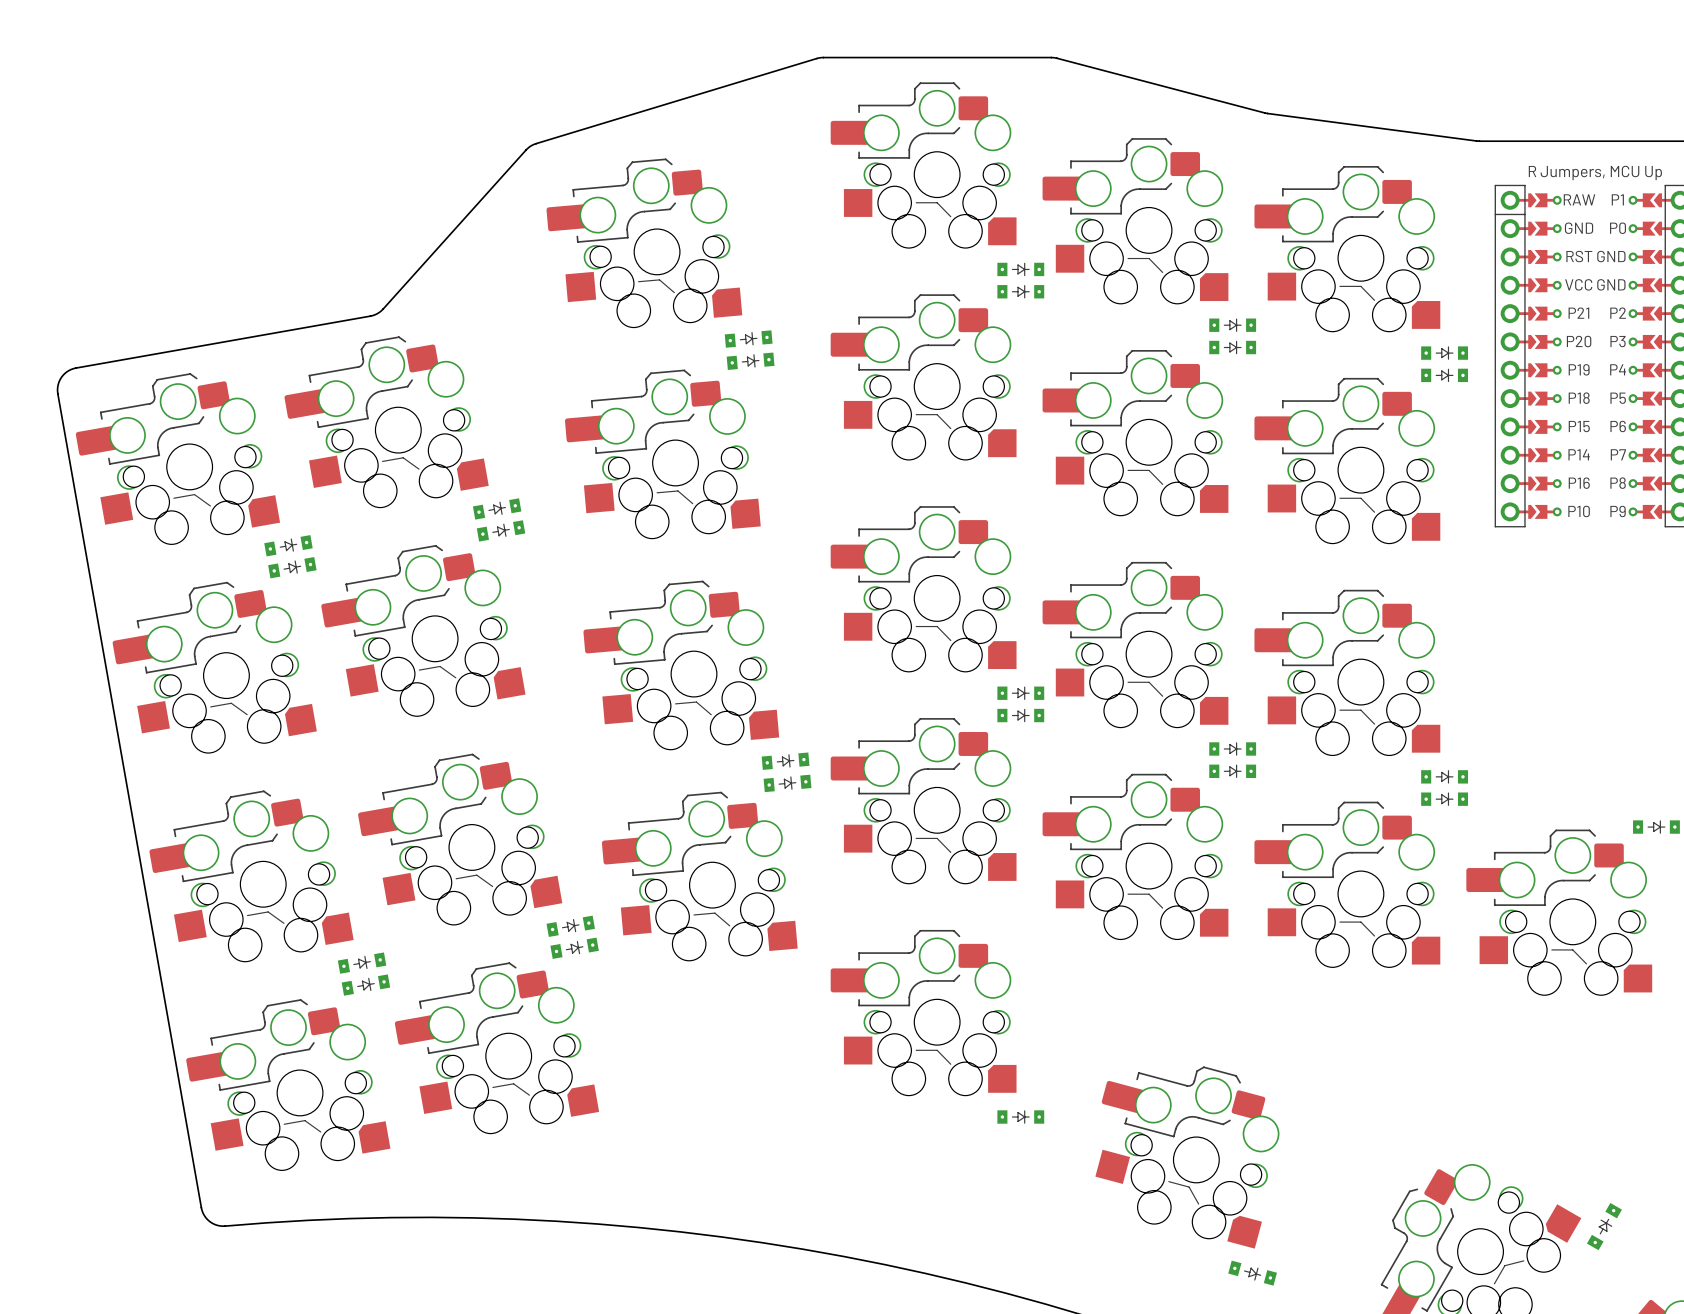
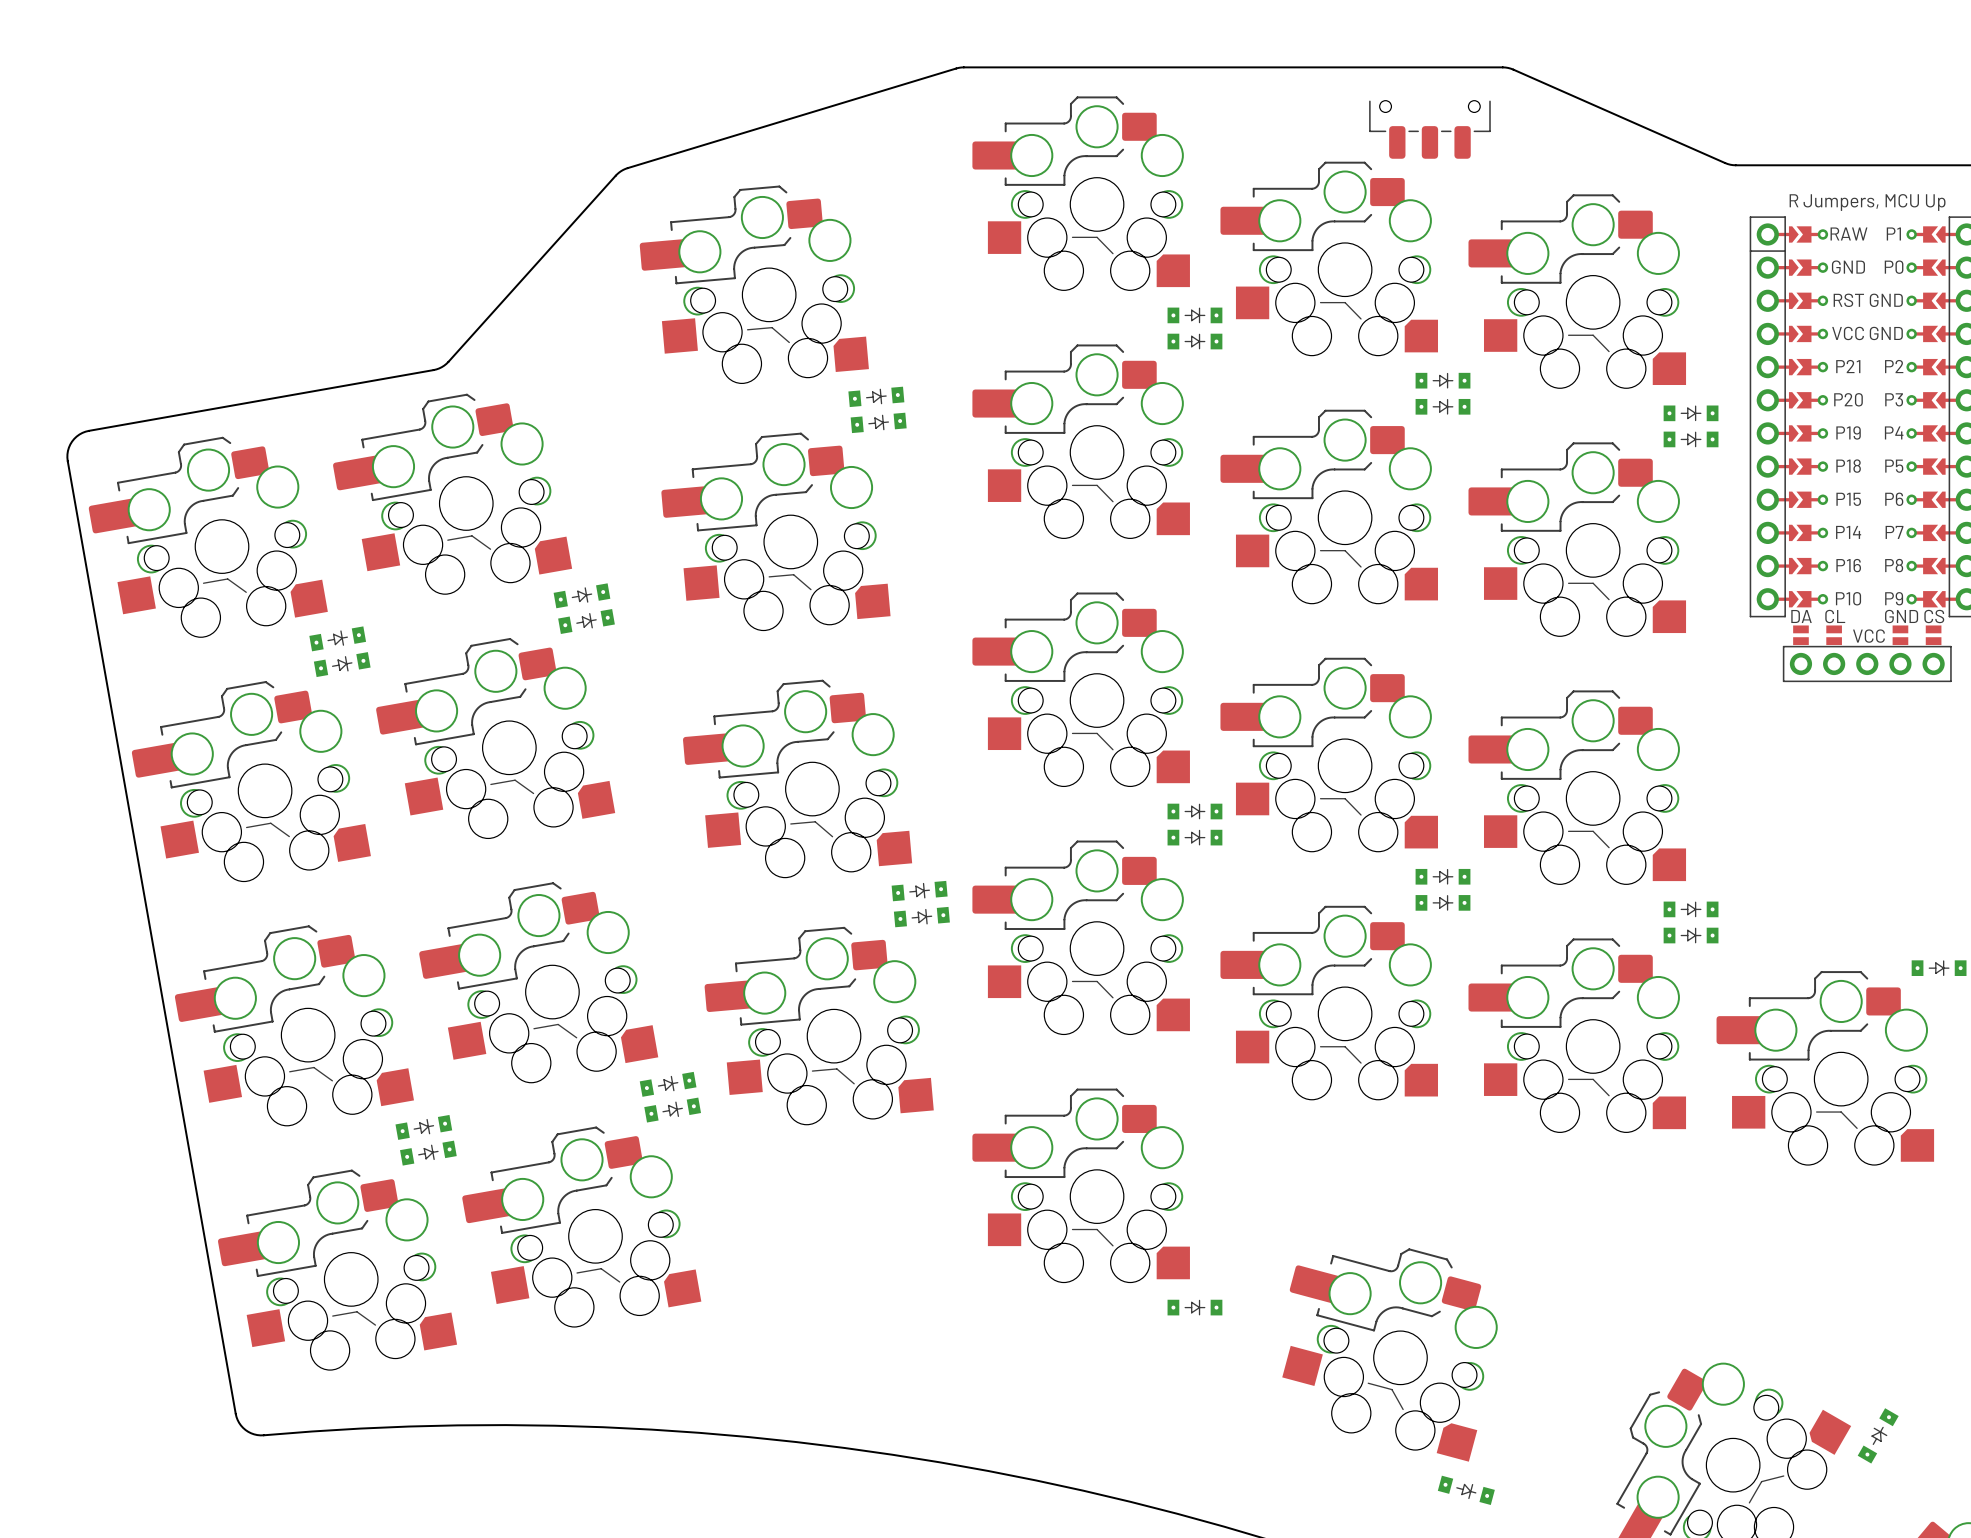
board edge: (1051, 57) (1266, 113) (1482, 141) -> (1230, 67) (1508, 67) (1725, 163) (1735, 165)
part: none -> (1429, 129)
part: none -> (1867, 653)

